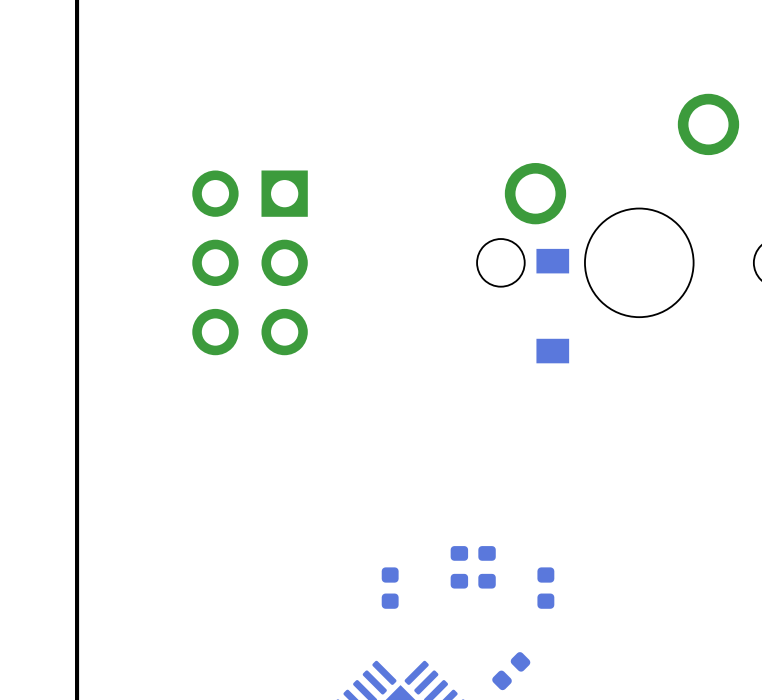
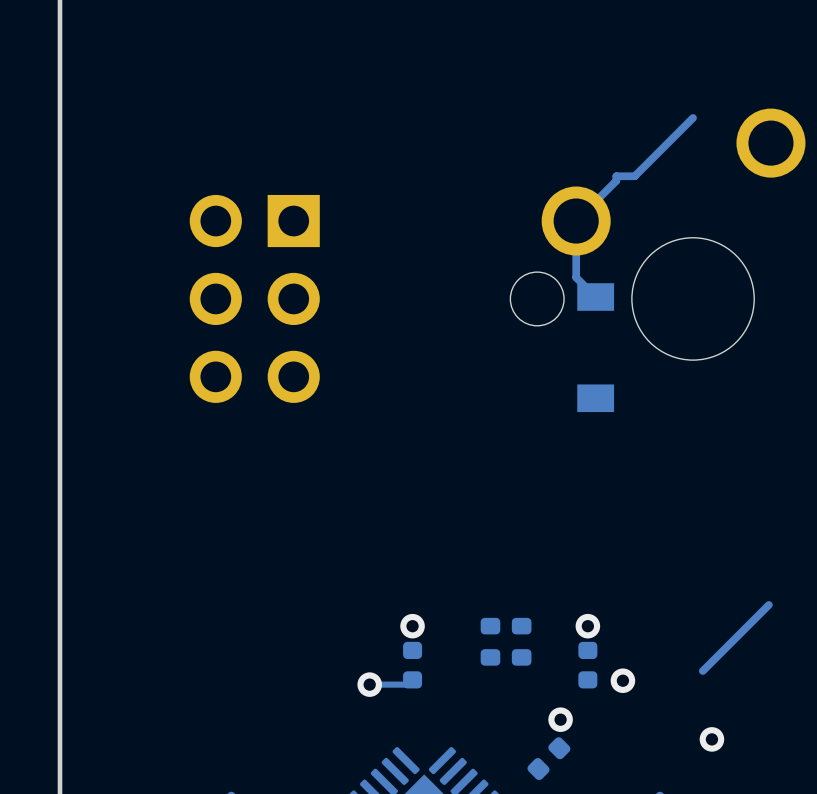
bottom track: none -> (693, 117) (634, 176) (616, 176) (616, 180) (576, 221) (576, 277) (595, 297)
bottom track: none -> (768, 604) (702, 671)
via: none -> (412, 626)
via: none -> (587, 626)
bottom track: none -> (412, 679) (407, 684) (369, 684)
via: none -> (622, 680)
via: none -> (369, 684)
via: none -> (560, 719)
via: none -> (711, 739)

